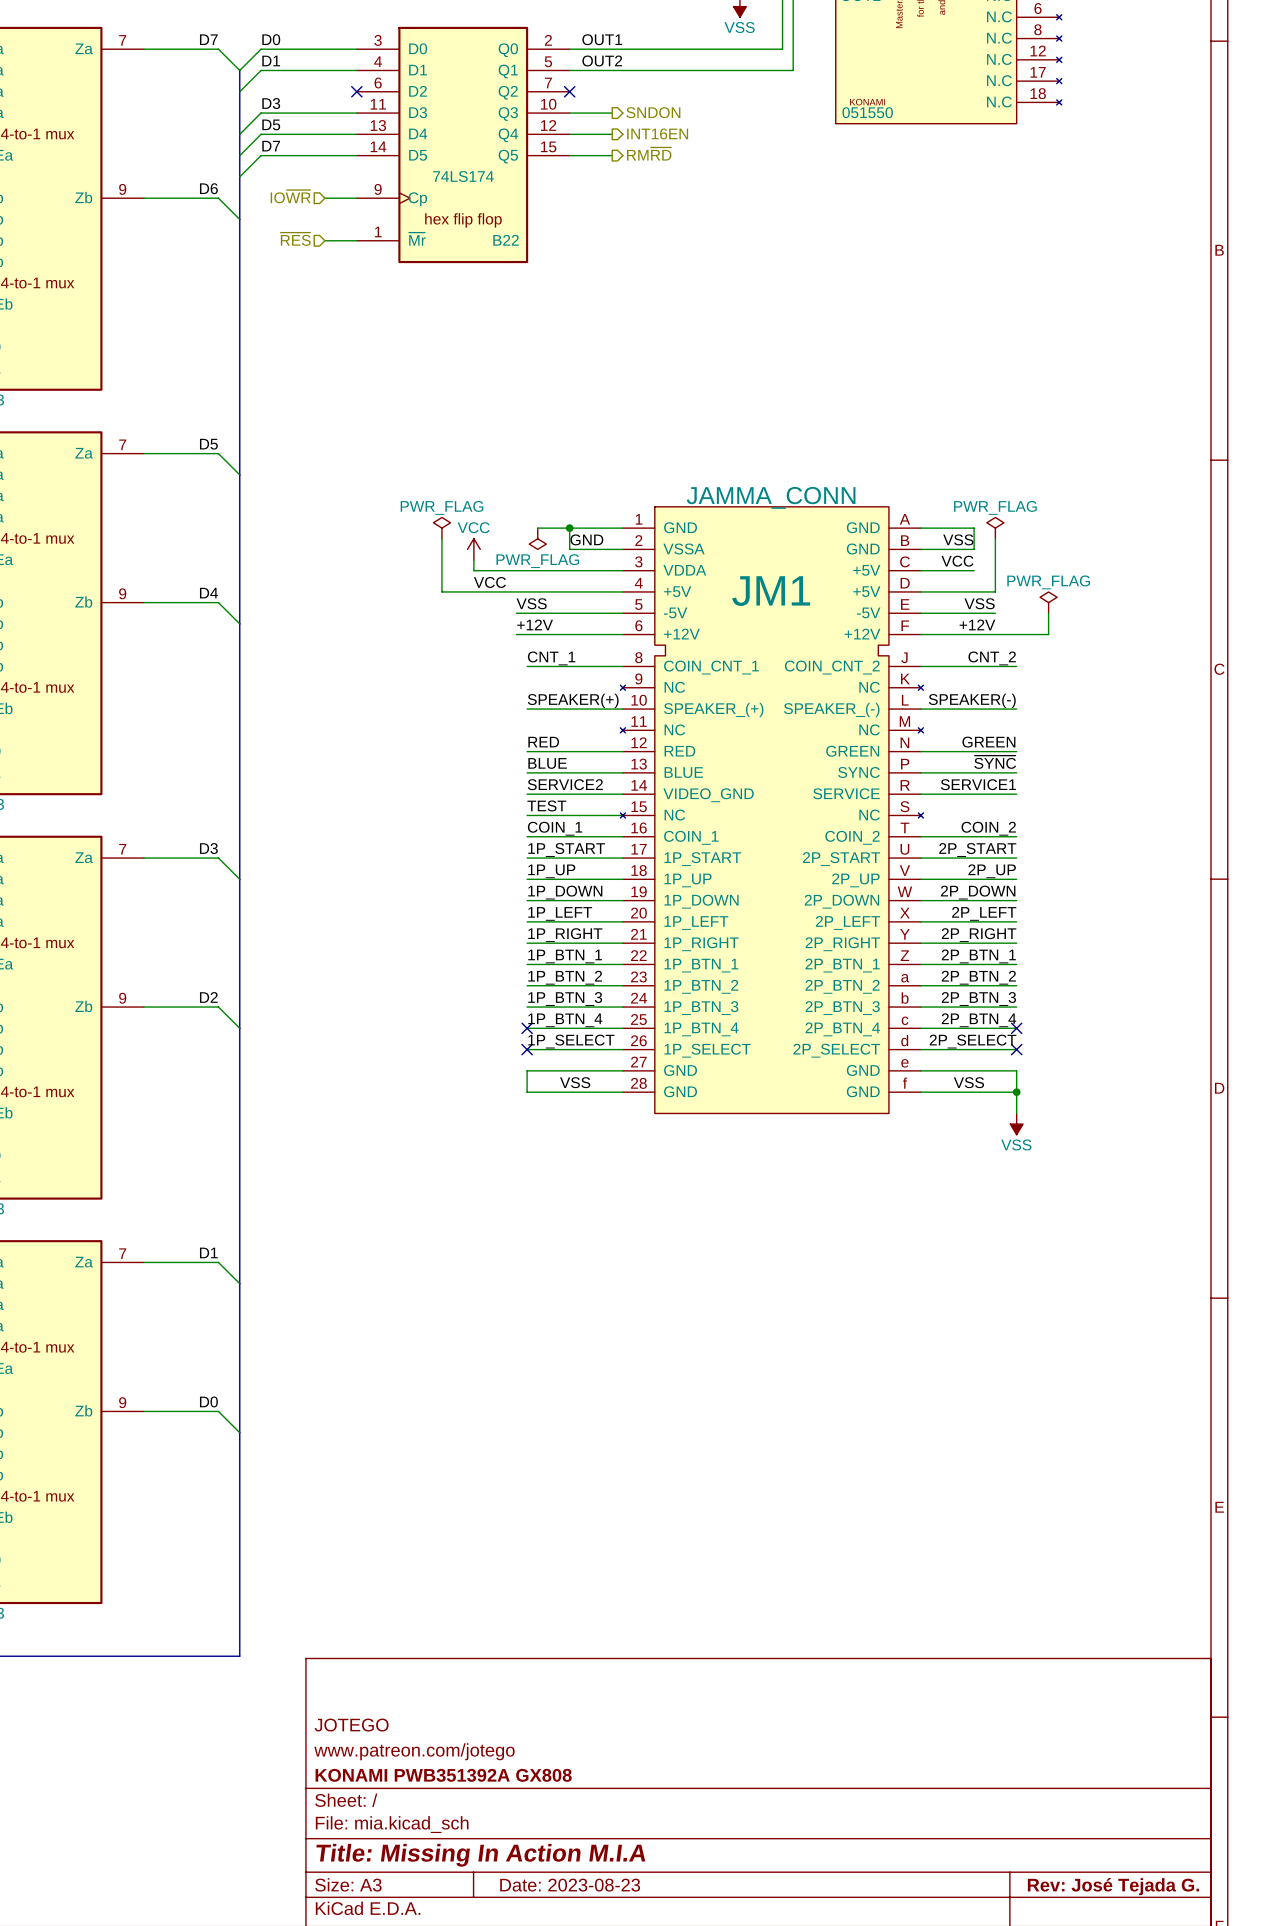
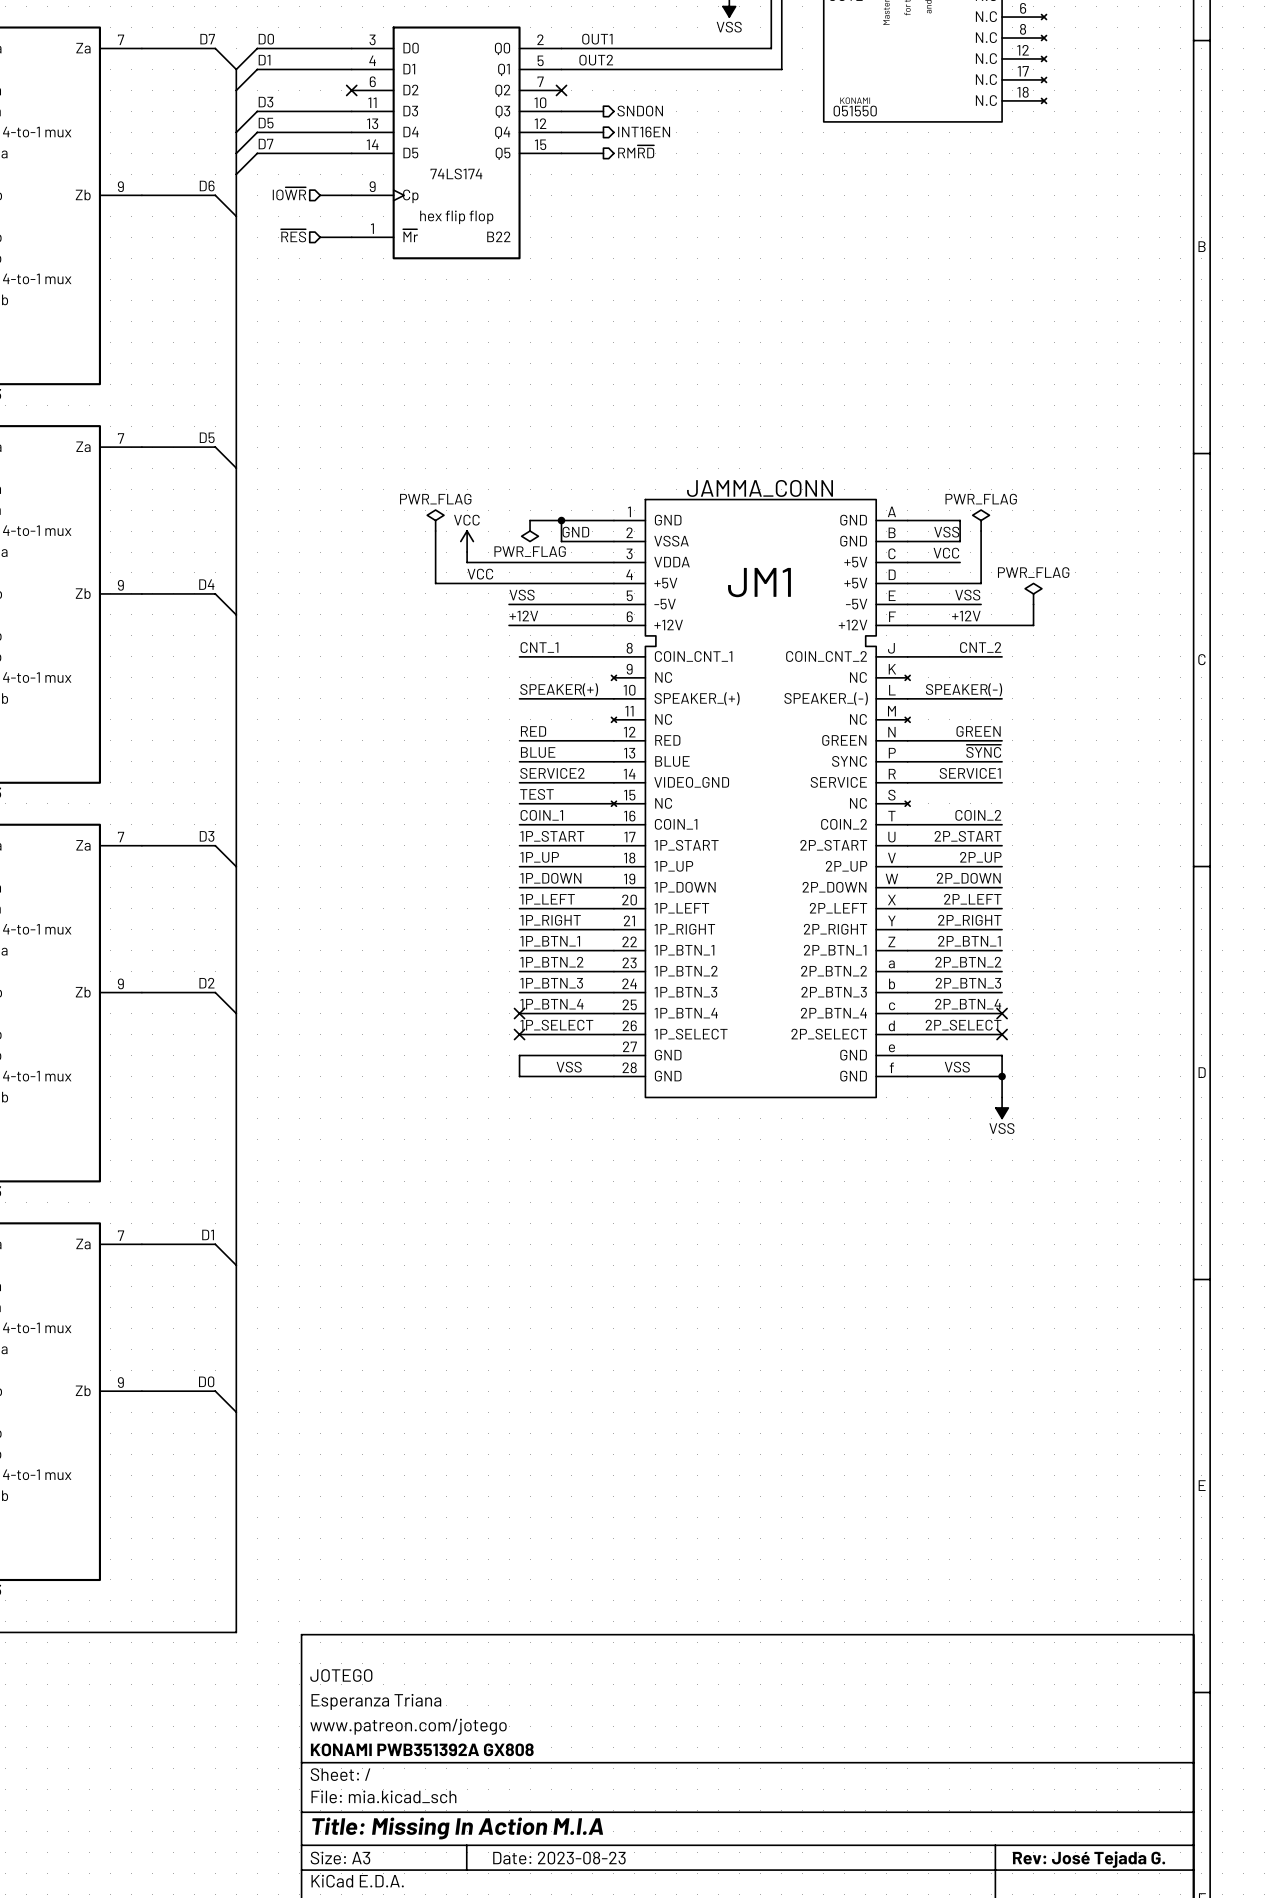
title block: none -> JOTEGO (341, 1675)
title block: JOTEGO (351, 1725) -> Esperanza Triana (376, 1701)

